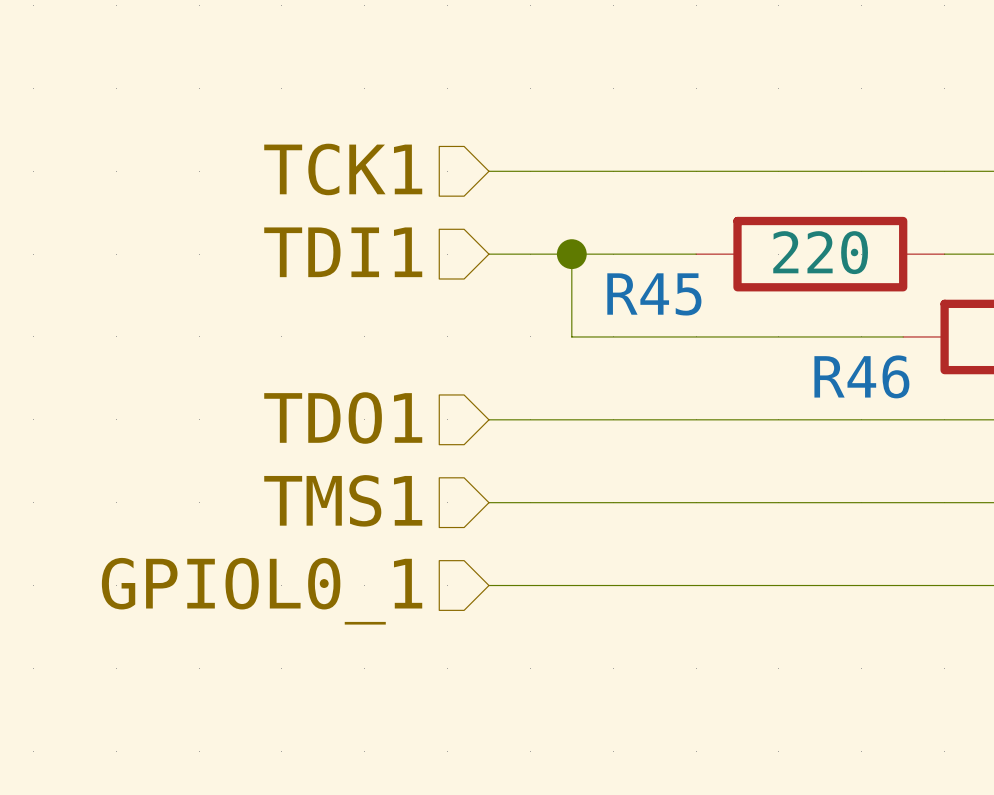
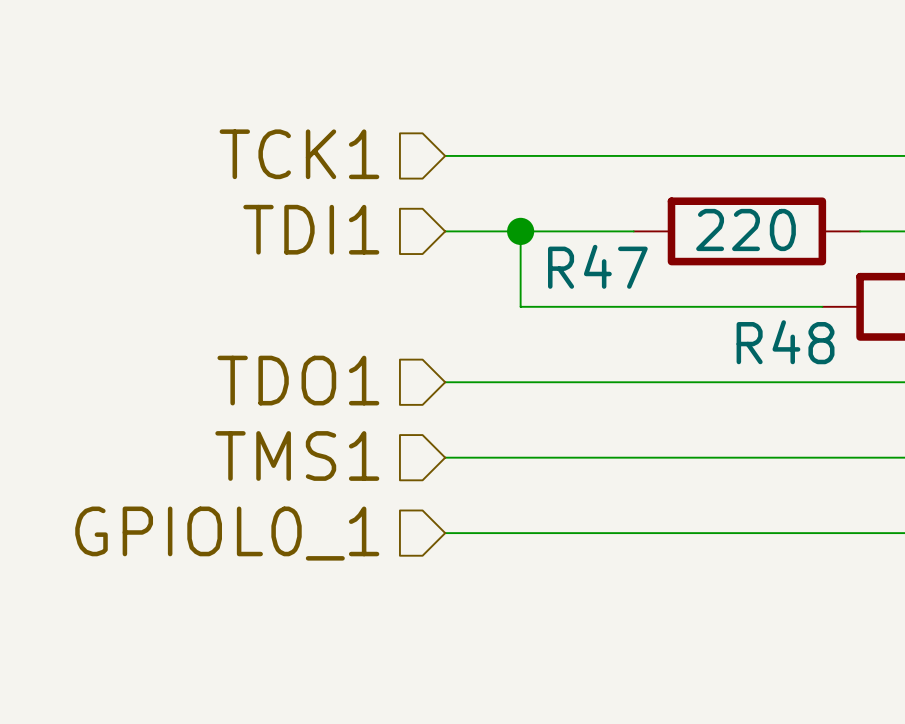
R45 name: R45 (654, 294) -> R47 (597, 266)
R46 name: R46 (861, 376) -> R48 (785, 342)

